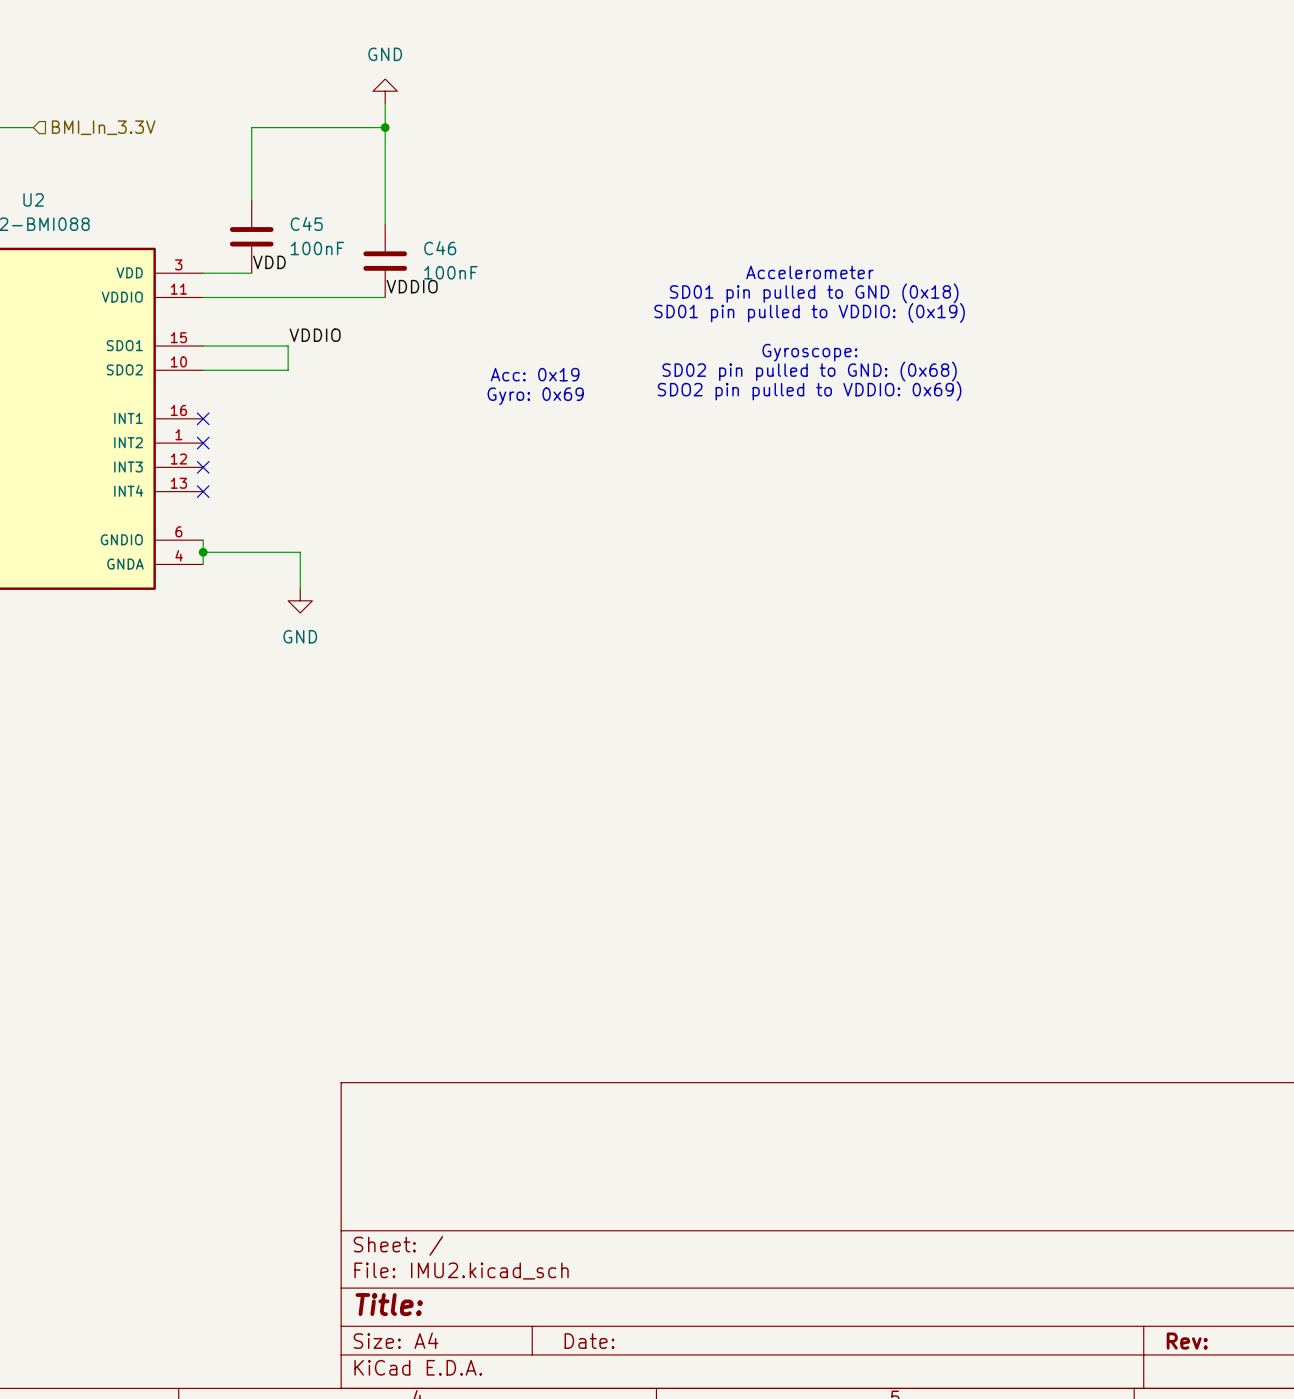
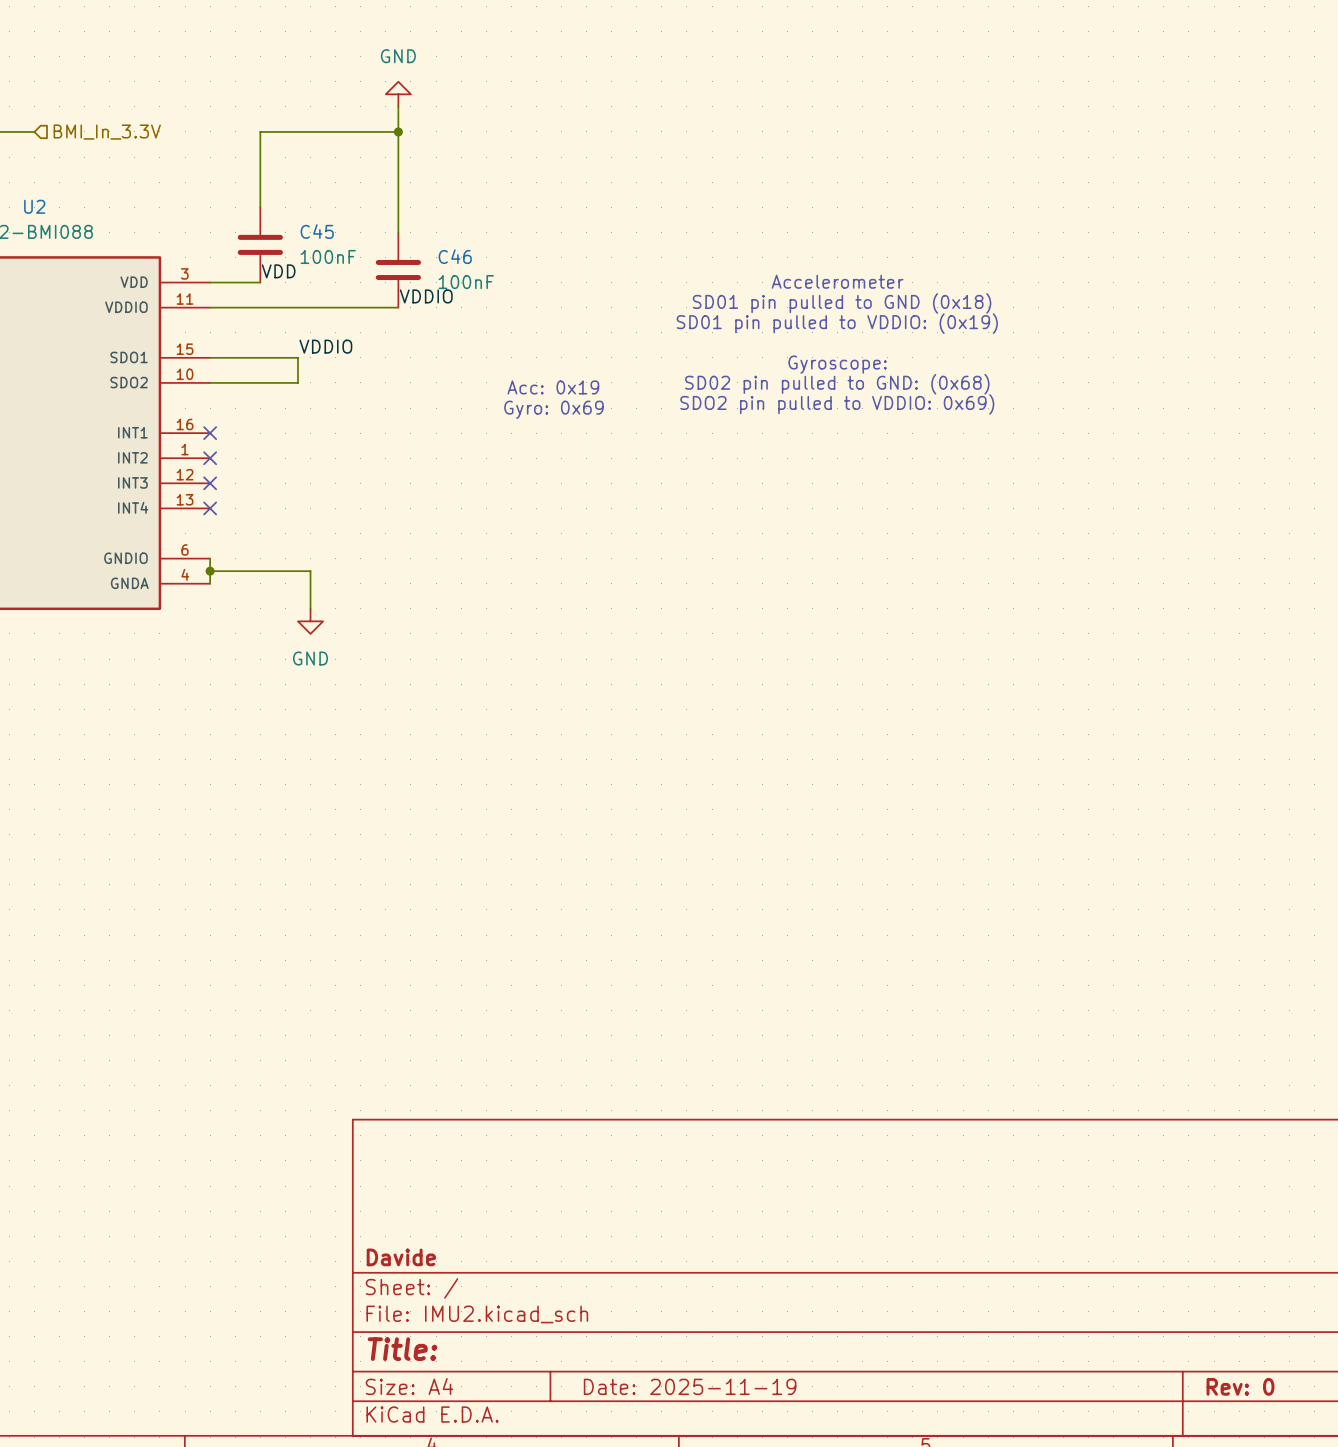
title block: none -> Davide (401, 1257)
title block: Date: (589, 1341) -> Date: 2025-11-19 (690, 1386)
title block: Rev: (1187, 1341) -> Rev: 0 (1240, 1386)

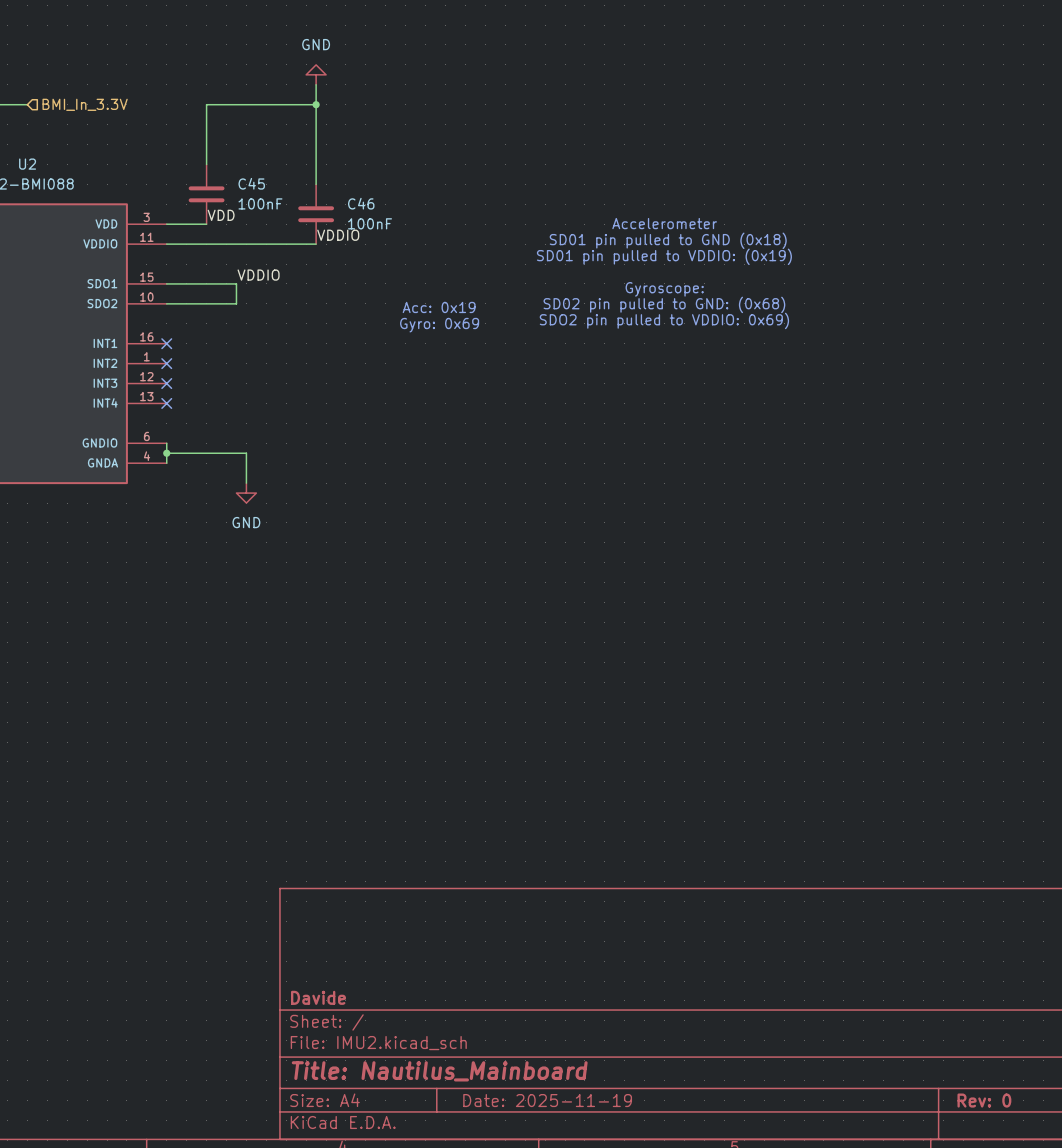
title block: Title: (402, 1349) -> Title: Nautilus_Mainboard (439, 1071)

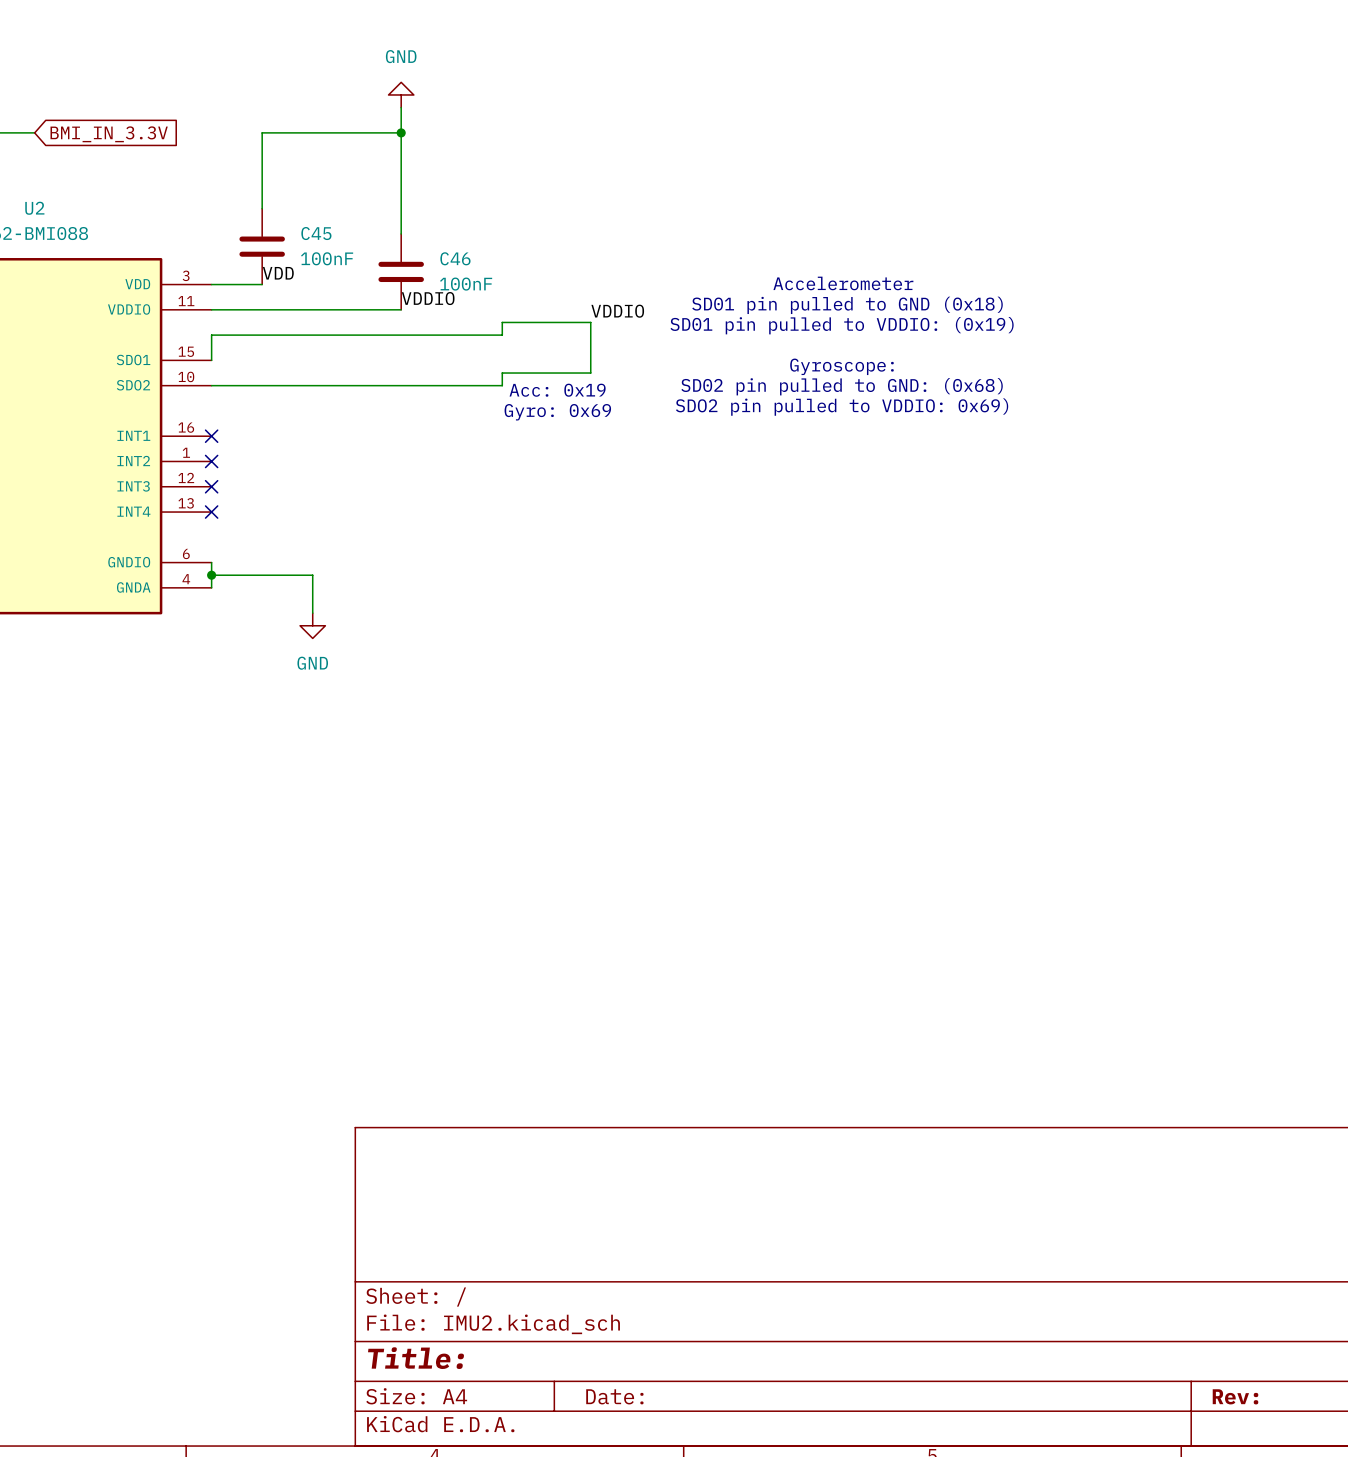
hierarchical label: BMI_In_3.3V (85, 104) -> none
global label: none -> BMI_IN_3.3V (109, 134)
label: none -> VDDIO (617, 311)
label: VDDIO (258, 275) -> none
wire: (166, 283) (236, 283) (236, 303) -> (211, 360) (211, 335) (502, 335) (502, 322) (590, 322) (590, 373) (502, 373) (502, 385) (300, 385)
title block: Davide (318, 997) -> none
title block: Title: Nautilus_Mainboard (439, 1071) -> Title: (416, 1358)
title block: Date: 2025-11-19 (547, 1100) -> Date: (614, 1396)
title block: Rev: 0 (984, 1100) -> Rev: (1235, 1396)

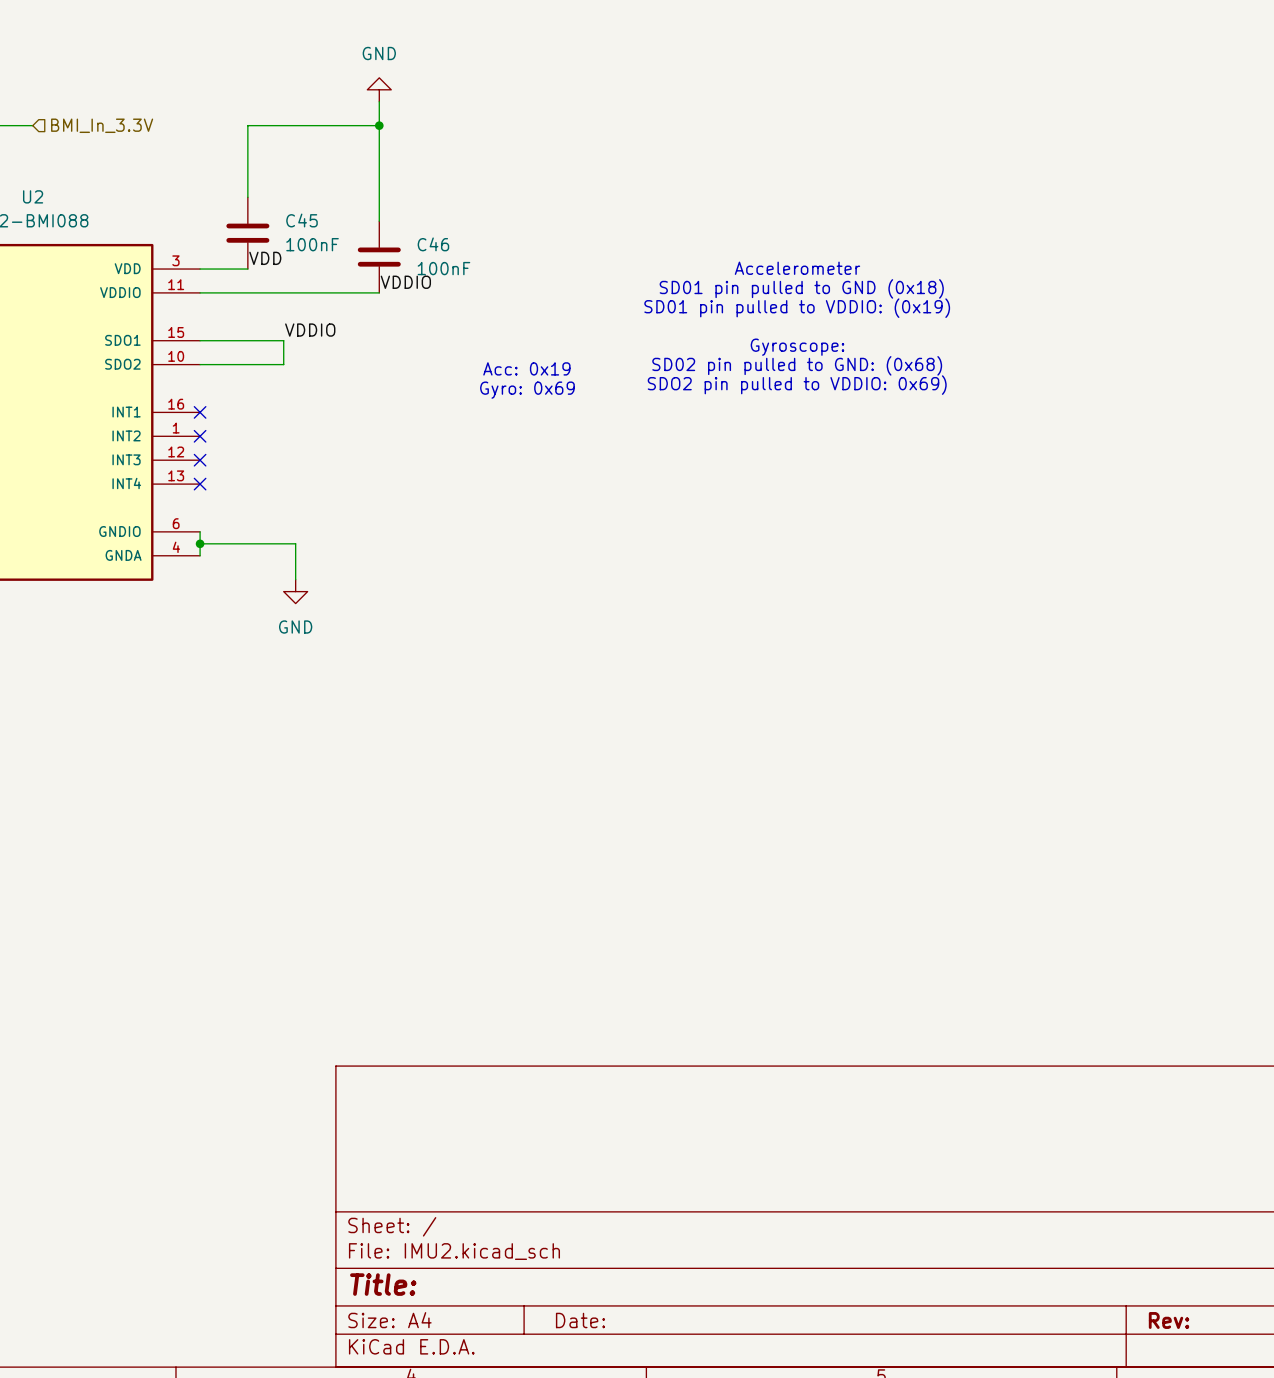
hierarchical label: none -> BMI_In_3.3V (102, 125)
global label: BMI_IN_3.3V (109, 134) -> none
label: VDDIO (617, 311) -> none
label: none -> VDDIO (310, 330)
wire: (211, 360) (211, 335) (502, 335) (502, 322) (590, 322) (590, 373) (502, 373) (502, 385) (300, 385) -> (200, 340) (283, 340) (283, 364)

